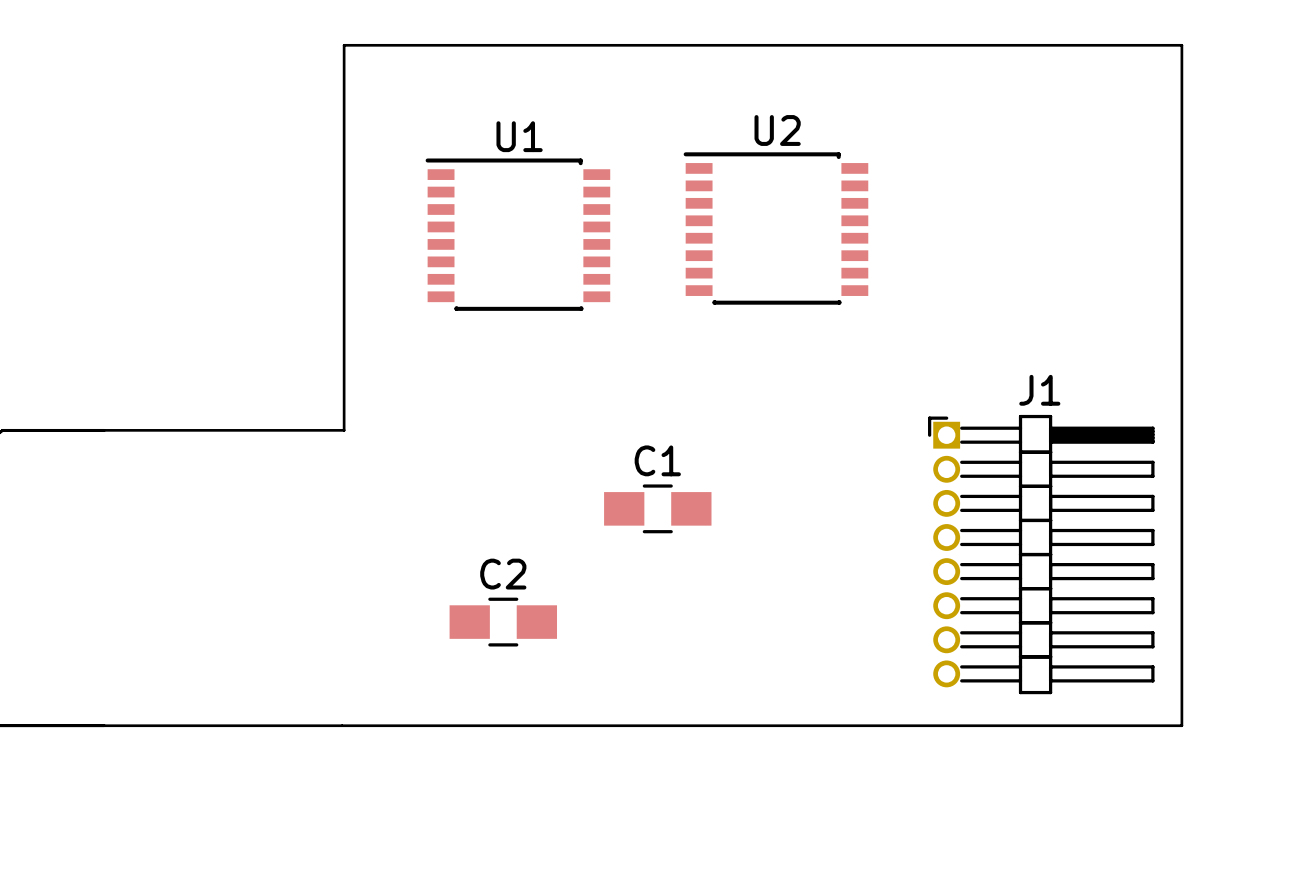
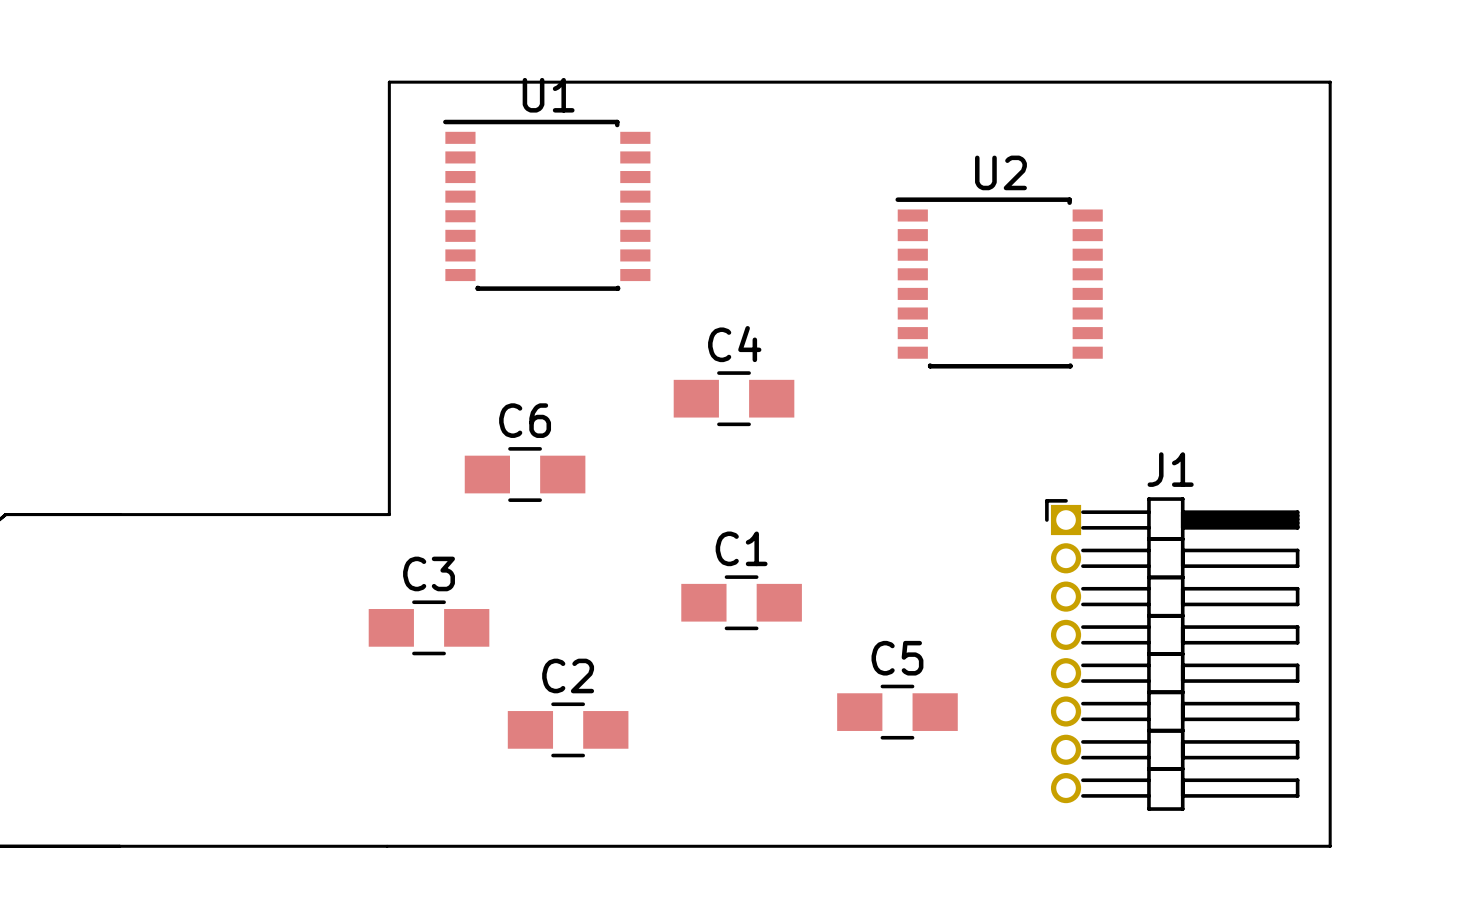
U2 position: (775, 228) -> (999, 282)
U1 position: (517, 234) -> (546, 205)
C4: none -> (734, 398)
C6: none -> (525, 474)
C3: none -> (429, 627)
C5: none -> (897, 712)

